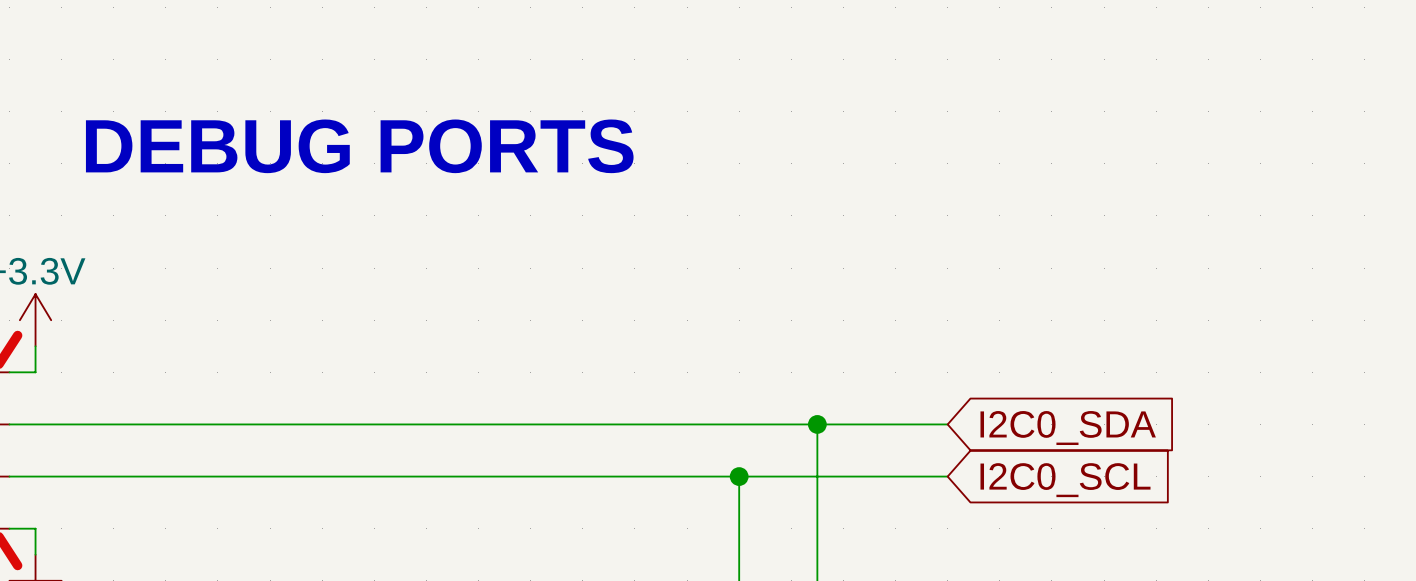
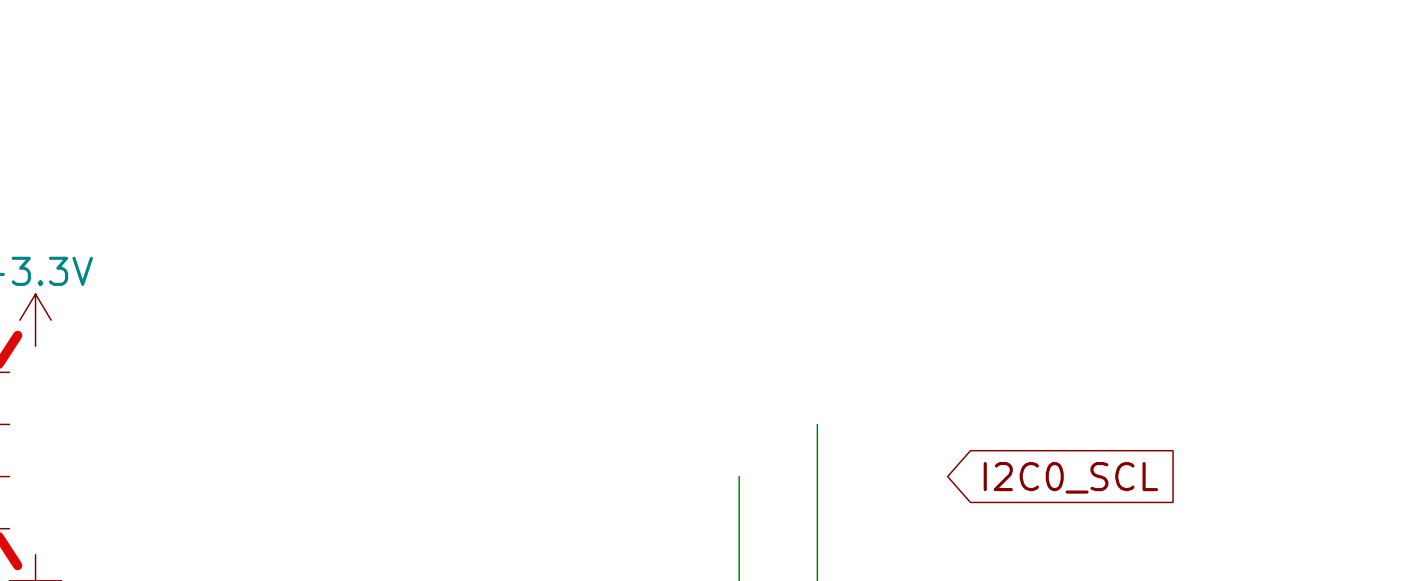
text: DEBUG PORTS (359, 146) -> none
wire: (35, 346) (35, 372) (9, 372) -> none
wire: (9, 424) (947, 424) -> none
junction: (817, 424) -> none
global label: I2C0_SDA (1068, 428) -> none
wire: (9, 476) (947, 476) -> none
junction: (739, 476) -> none
wire: (9, 528) (35, 528) (35, 554) -> none

